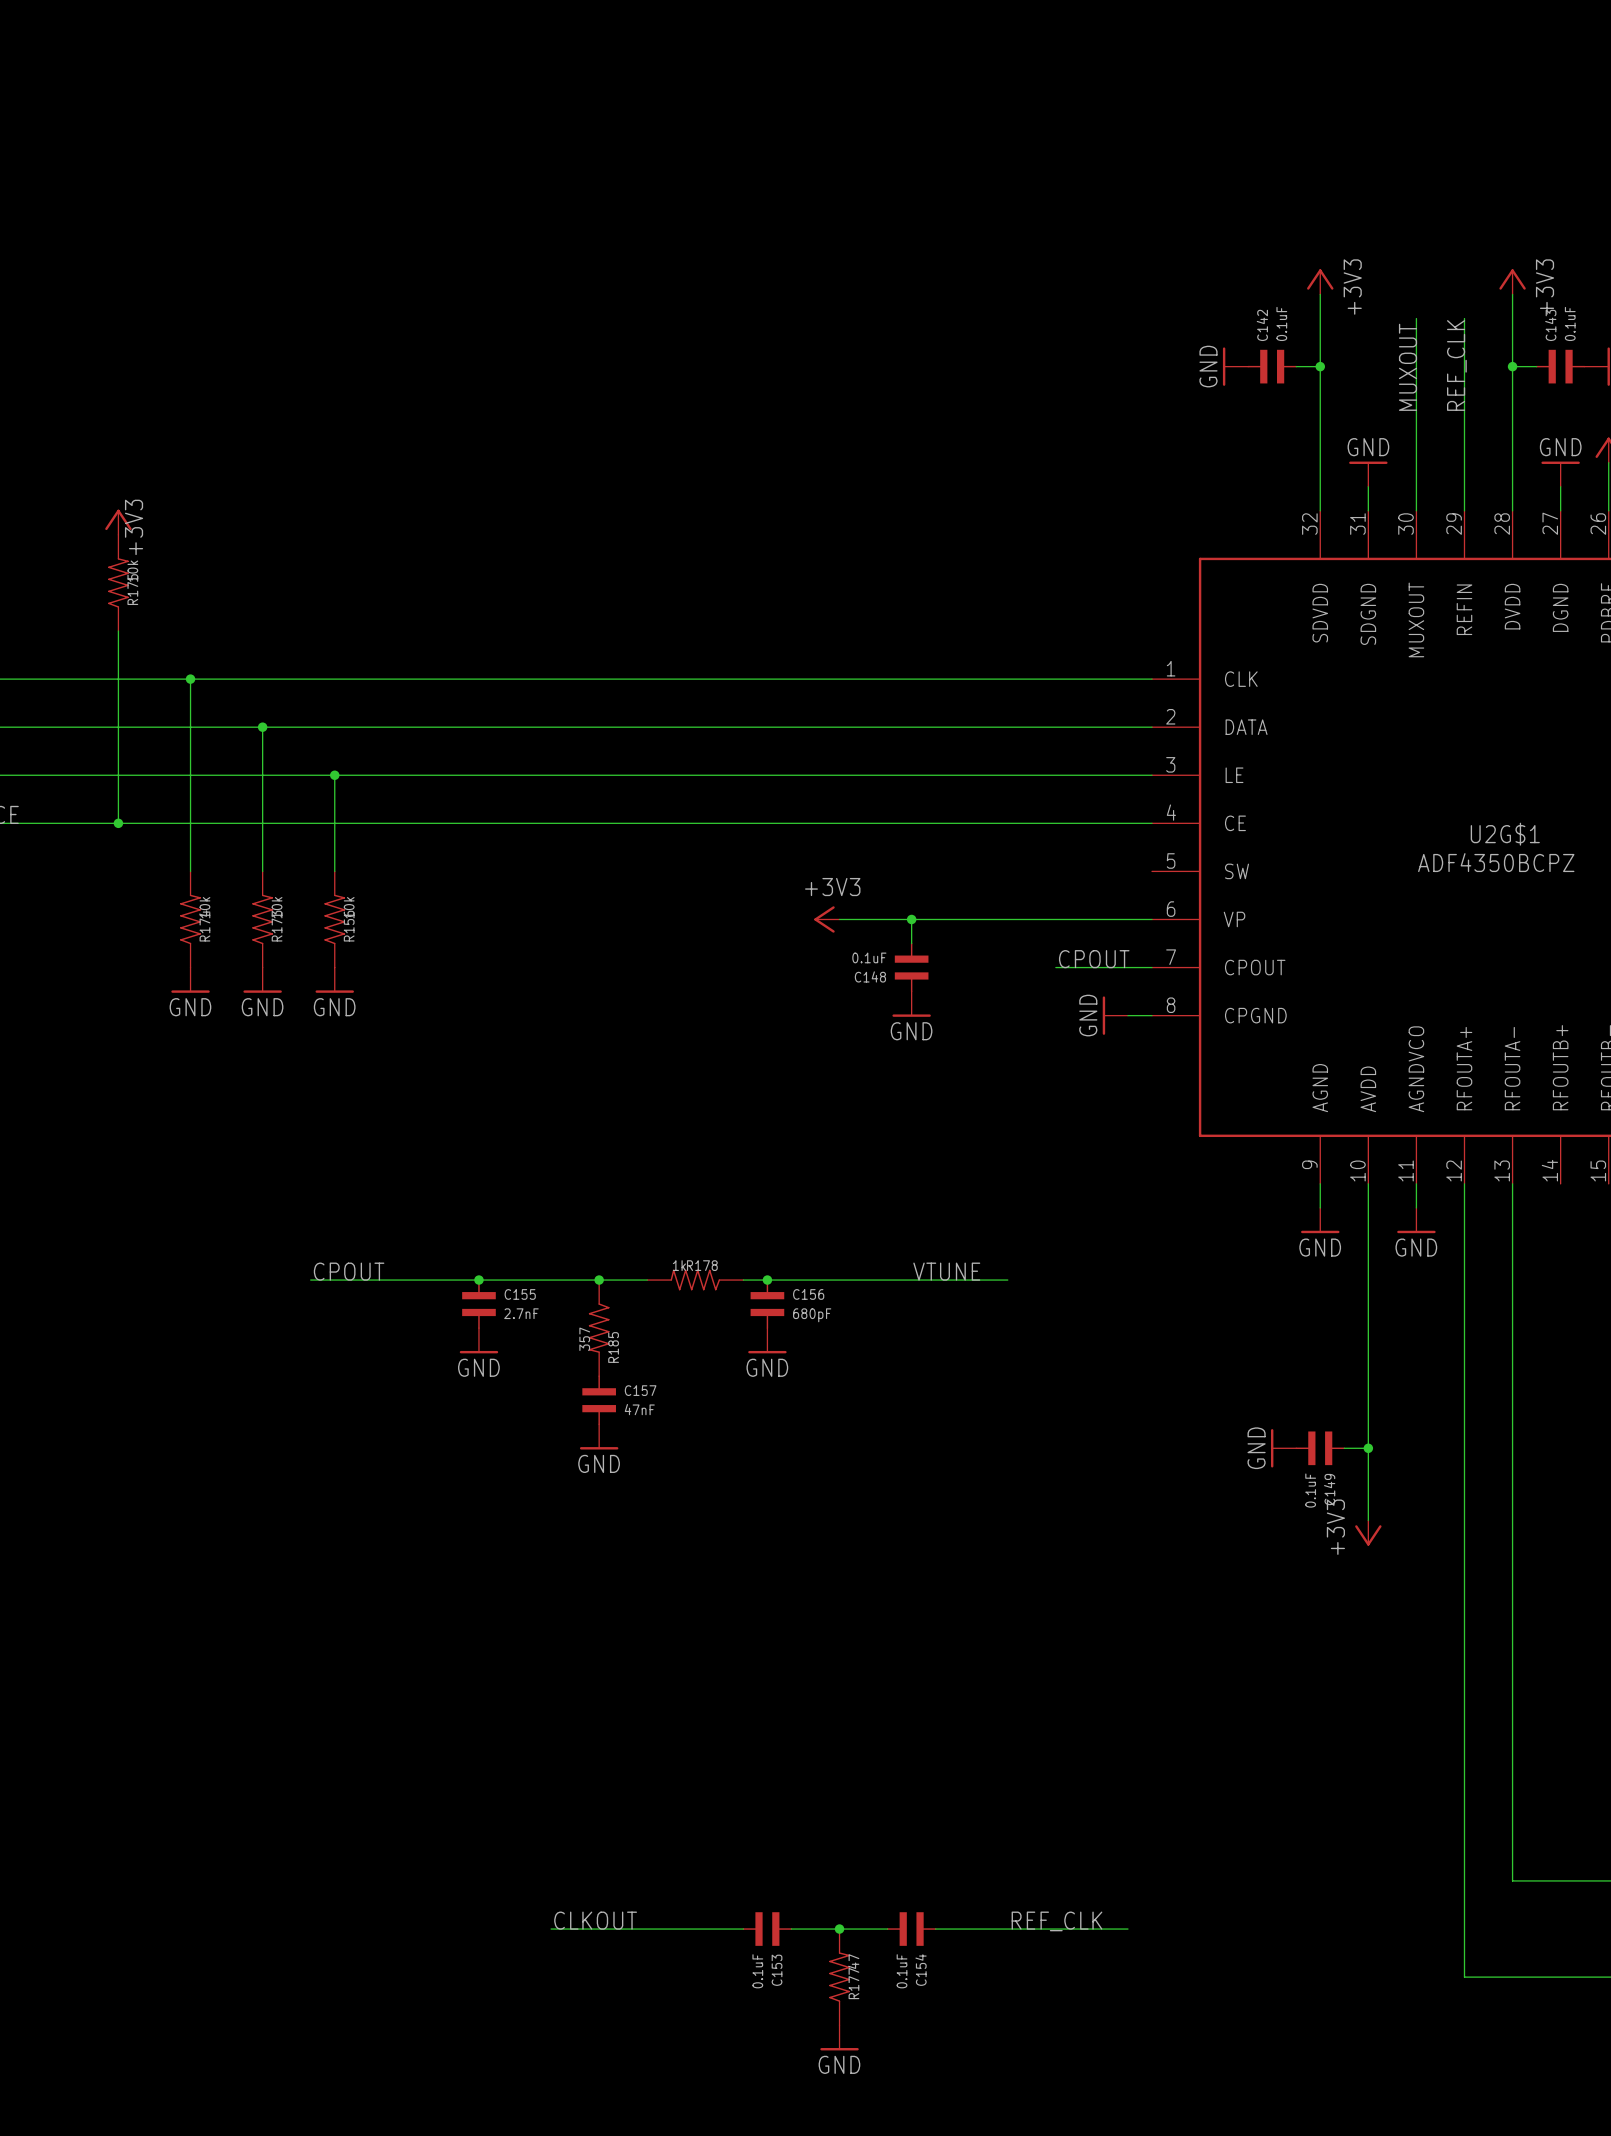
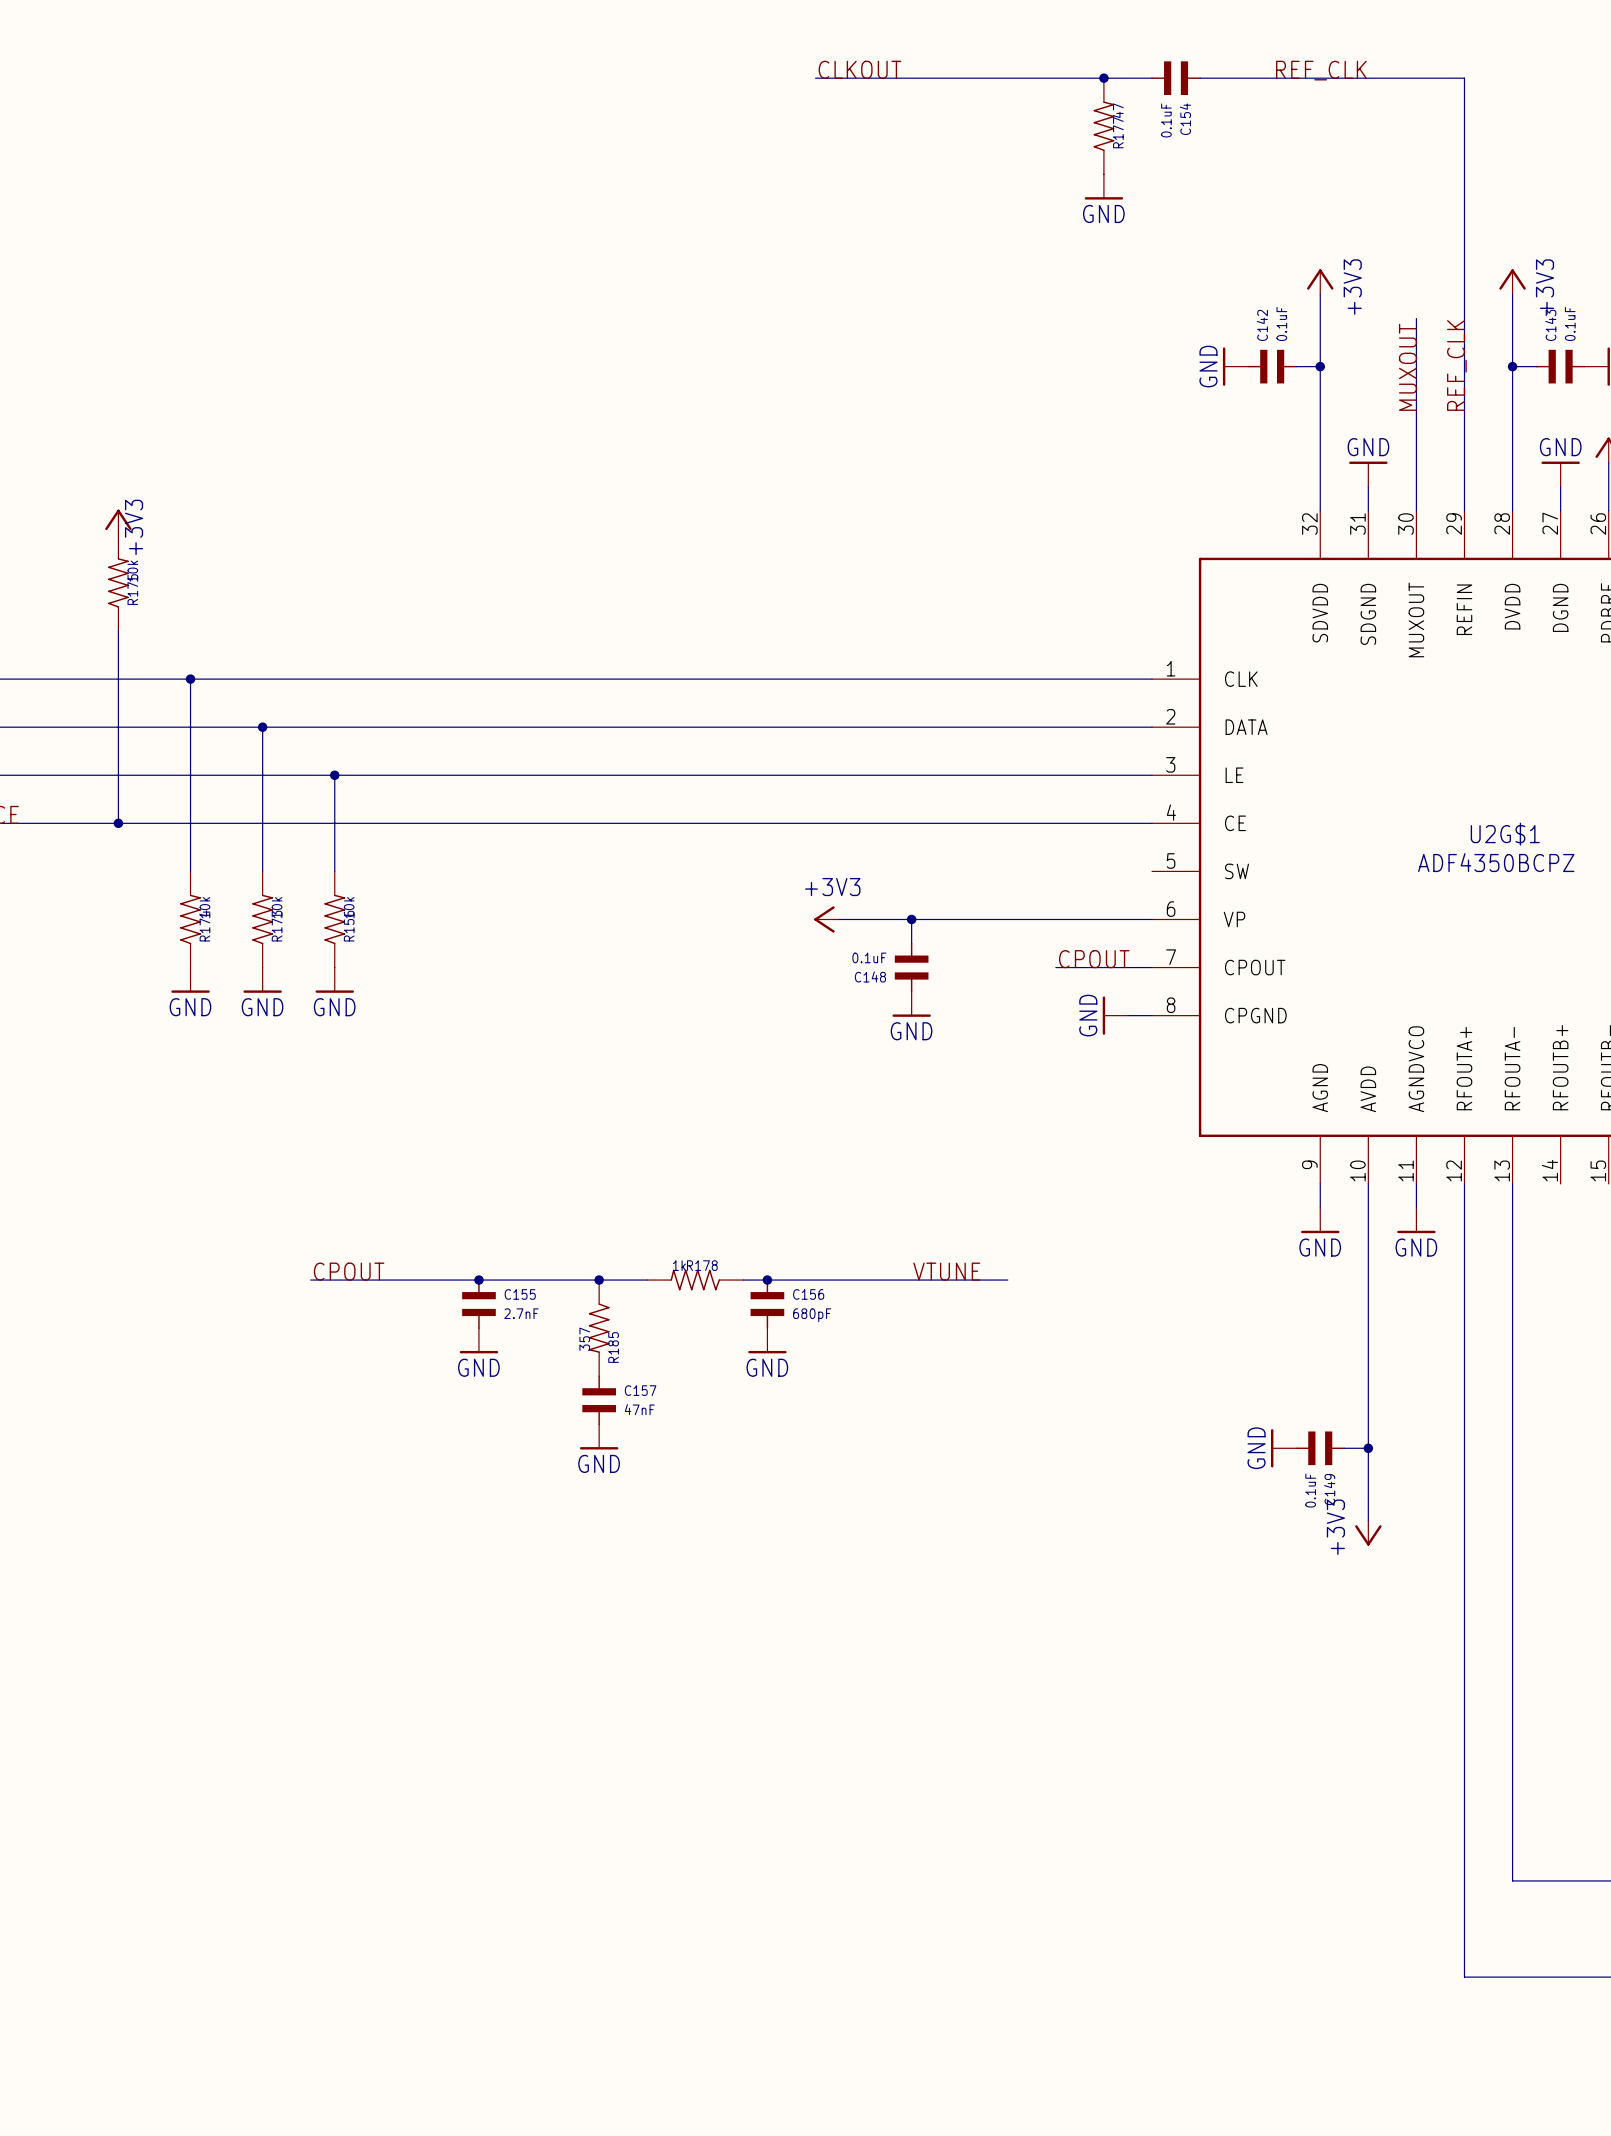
label: none -> CLKOUT (860, 69)
label: none -> REF_CLK (1321, 70)
wire: none -> (815, 78) (1152, 78)
junction: none -> (1103, 78)
wire: none -> (1200, 78) (1464, 78) (1464, 318)
power symbol: none -> GND (1103, 186)
label: CLKOUT (595, 1920) -> none
label: REF_CLK (1056, 1921) -> none
wire: (551, 1929) (743, 1929) -> none
C153: 0.1uF (767, 1929) -> none
wire: (791, 1929) (887, 1929) -> none
junction: (839, 1929) -> none
C154 position: (911, 1929) -> (1176, 78)
wire: (935, 1929) (1127, 1929) -> none
R177 position: (839, 1977) -> (1103, 126)
power symbol: GND (839, 2037) -> none

